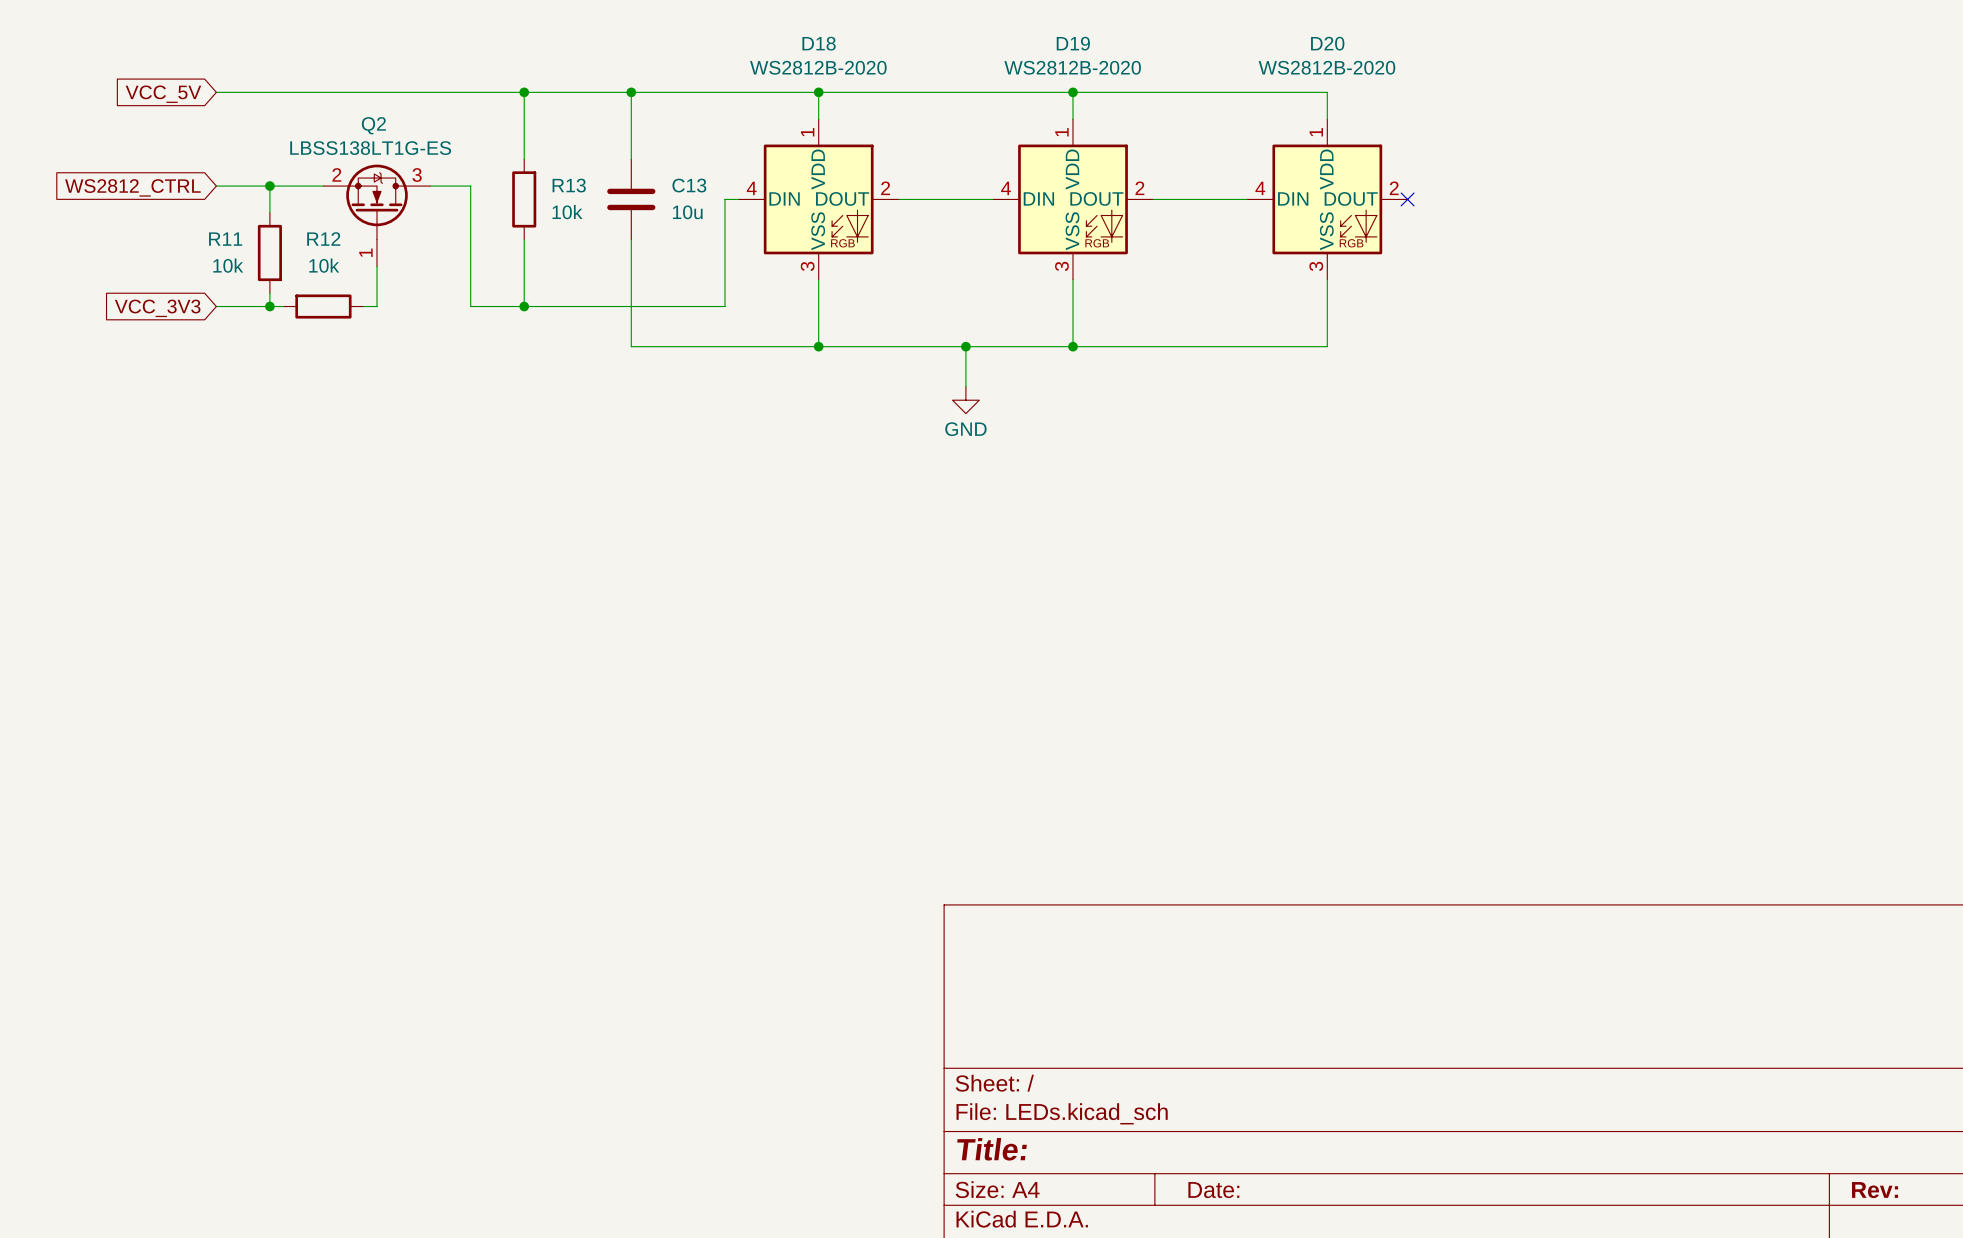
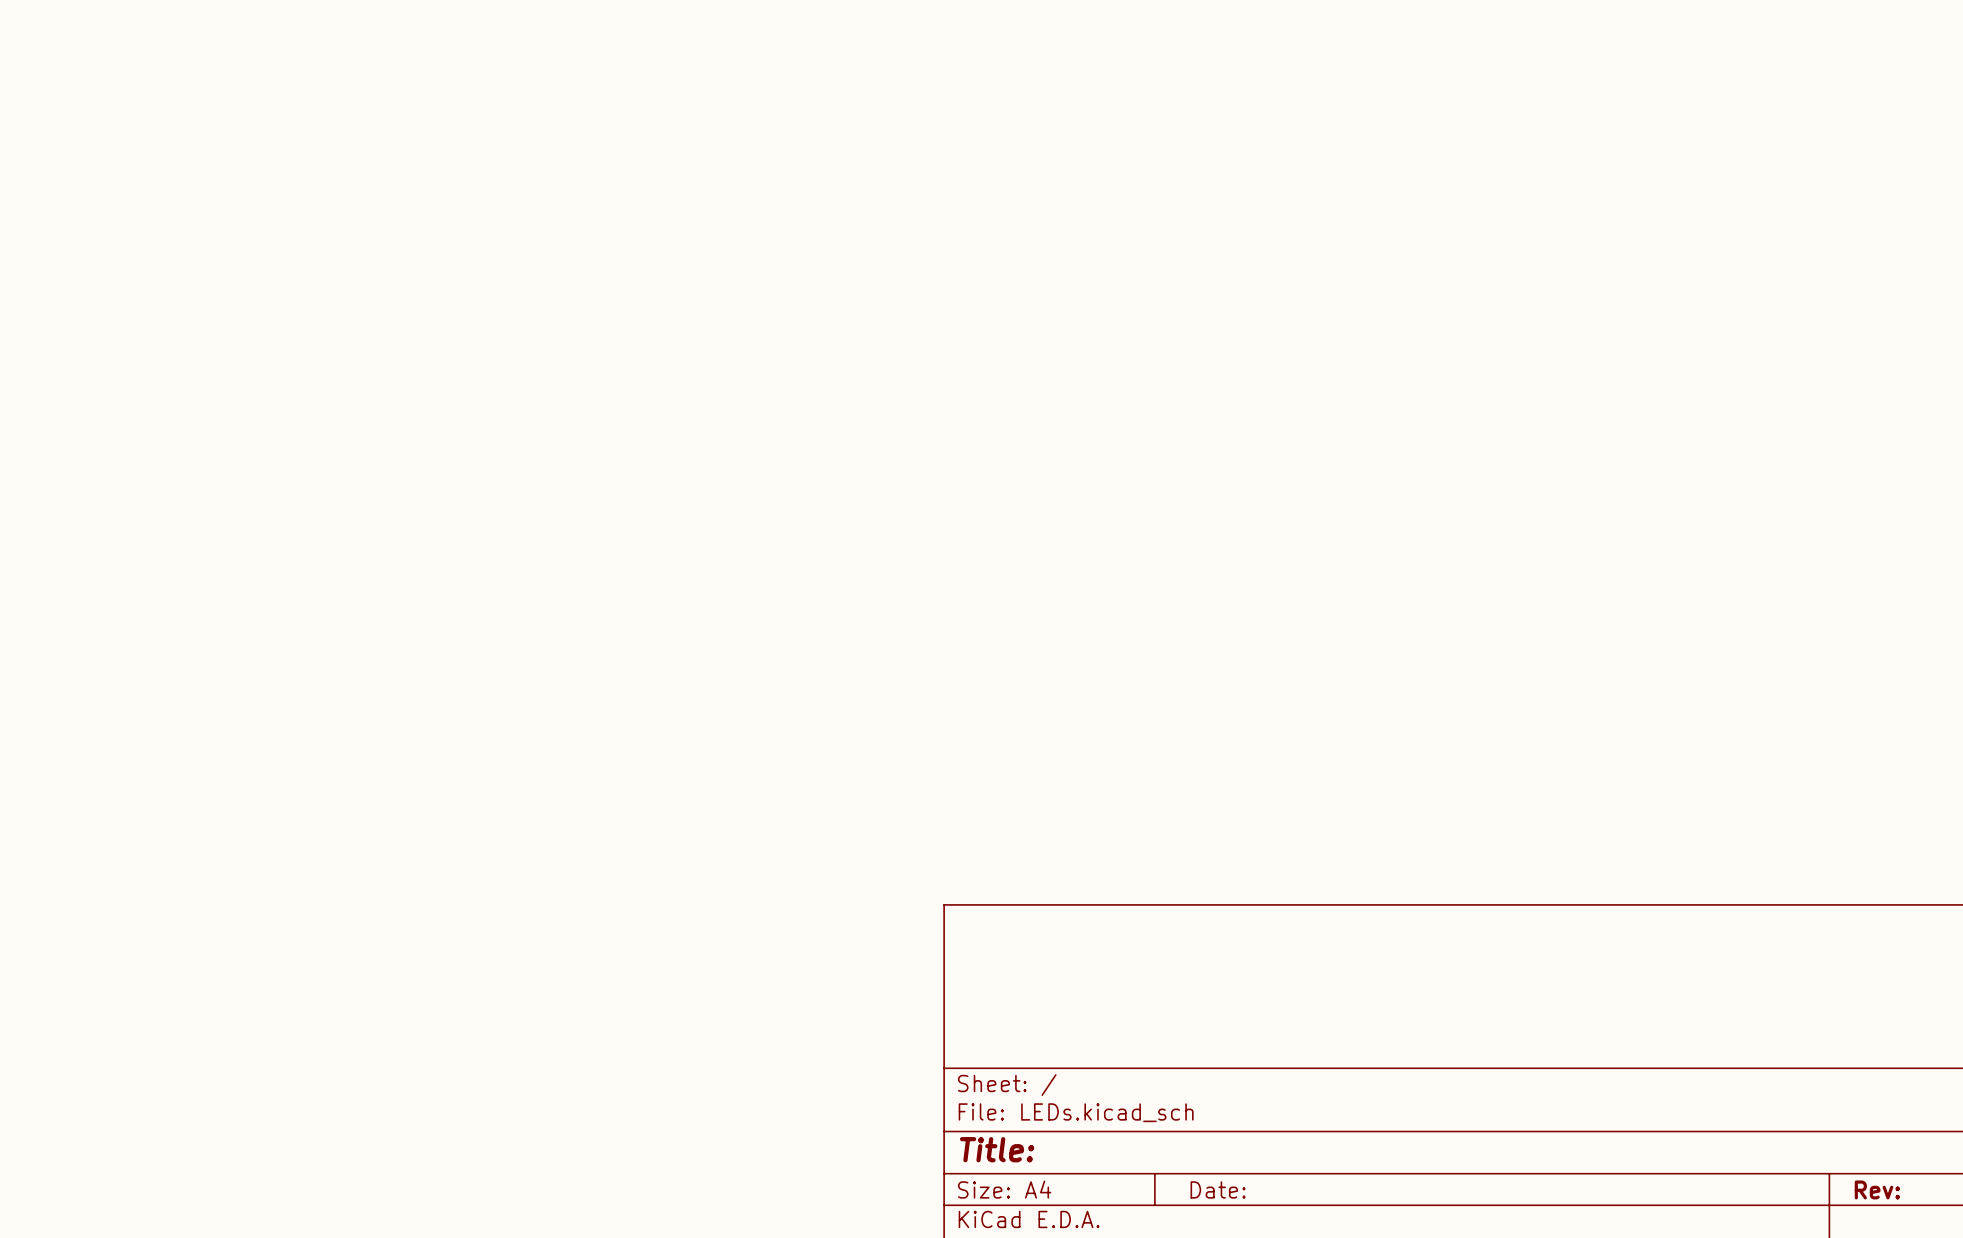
wire: (216, 92) (1327, 92) (1327, 119) -> none
wire: (524, 92) (524, 159) -> none
junction: (524, 92) -> none
wire: (631, 92) (631, 159) -> none
junction: (631, 92) -> none
wire: (818, 92) (818, 119) -> none
junction: (818, 92) -> none
wire: (1073, 92) (1073, 119) -> none
junction: (1073, 92) -> none
global label: VCC_5V (163, 94) -> none
wire: (216, 186) (323, 186) -> none
wire: (269, 186) (269, 212) -> none
junction: (269, 186) -> none
wire: (430, 186) (470, 186) (470, 306) (724, 306) (724, 199) (738, 199) -> none
global label: WS2812_CTRL (132, 187) -> none
R13: 10k (524, 199) -> none
C13: 10u (631, 199) -> none
D18: WS2812B-2020 (818, 199) -> none
wire: (898, 199) (992, 199) -> none
D19: WS2812B-2020 (1073, 199) -> none
wire: (1153, 199) (1247, 199) -> none
D20: WS2812B-2020 (1327, 199) -> none
no-connect mark: (1407, 199) -> none
Q2: LBSS138LT1G-ES (376, 215) -> none
wire: (524, 239) (524, 306) -> none
wire: (631, 239) (631, 346) (1327, 346) (1327, 279) -> none
R11: 10k (269, 252) -> none
wire: (376, 266) (376, 306) (363, 306) -> none
wire: (818, 279) (818, 346) -> none
wire: (1073, 279) (1073, 346) -> none
wire: (269, 293) (269, 306) -> none
wire: (216, 306) (283, 306) -> none
junction: (269, 306) -> none
R12: 10k (323, 306) -> none
junction: (524, 306) -> none
global label: VCC_3V3 (157, 308) -> none
junction: (818, 346) -> none
wire: (965, 346) (965, 386) -> none
junction: (965, 346) -> none
junction: (1073, 346) -> none
power symbol: GND (965, 400) -> none

